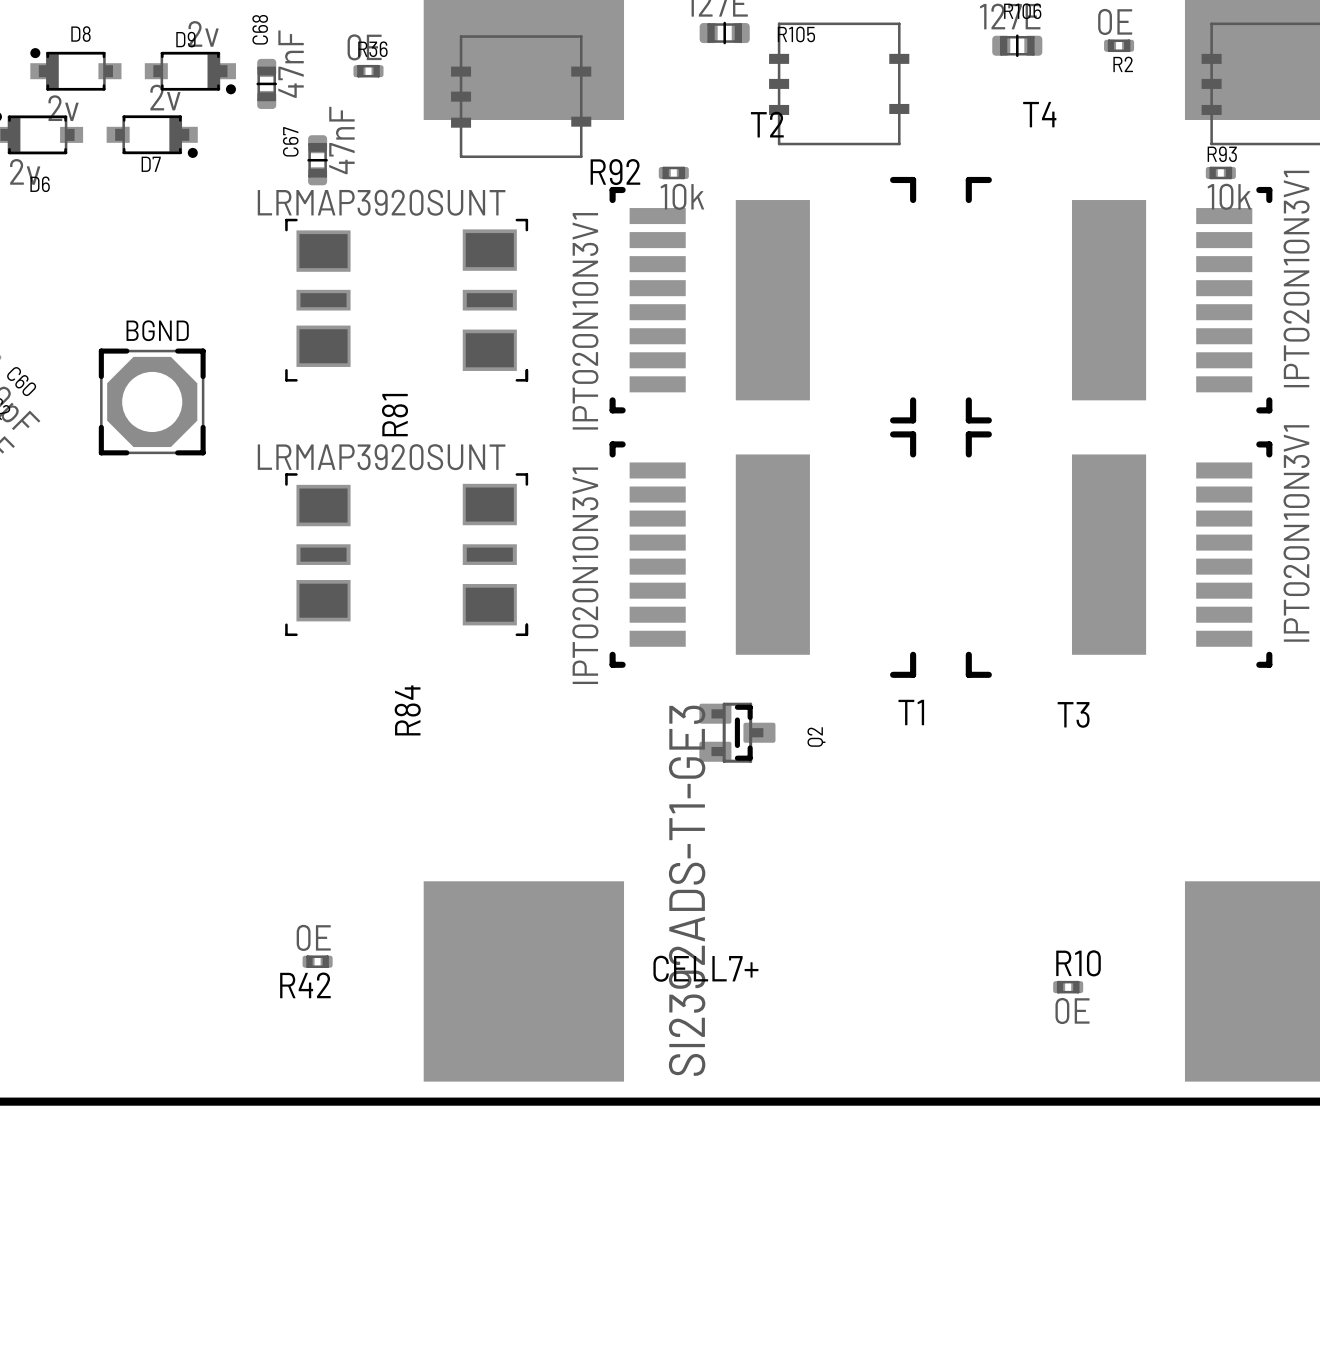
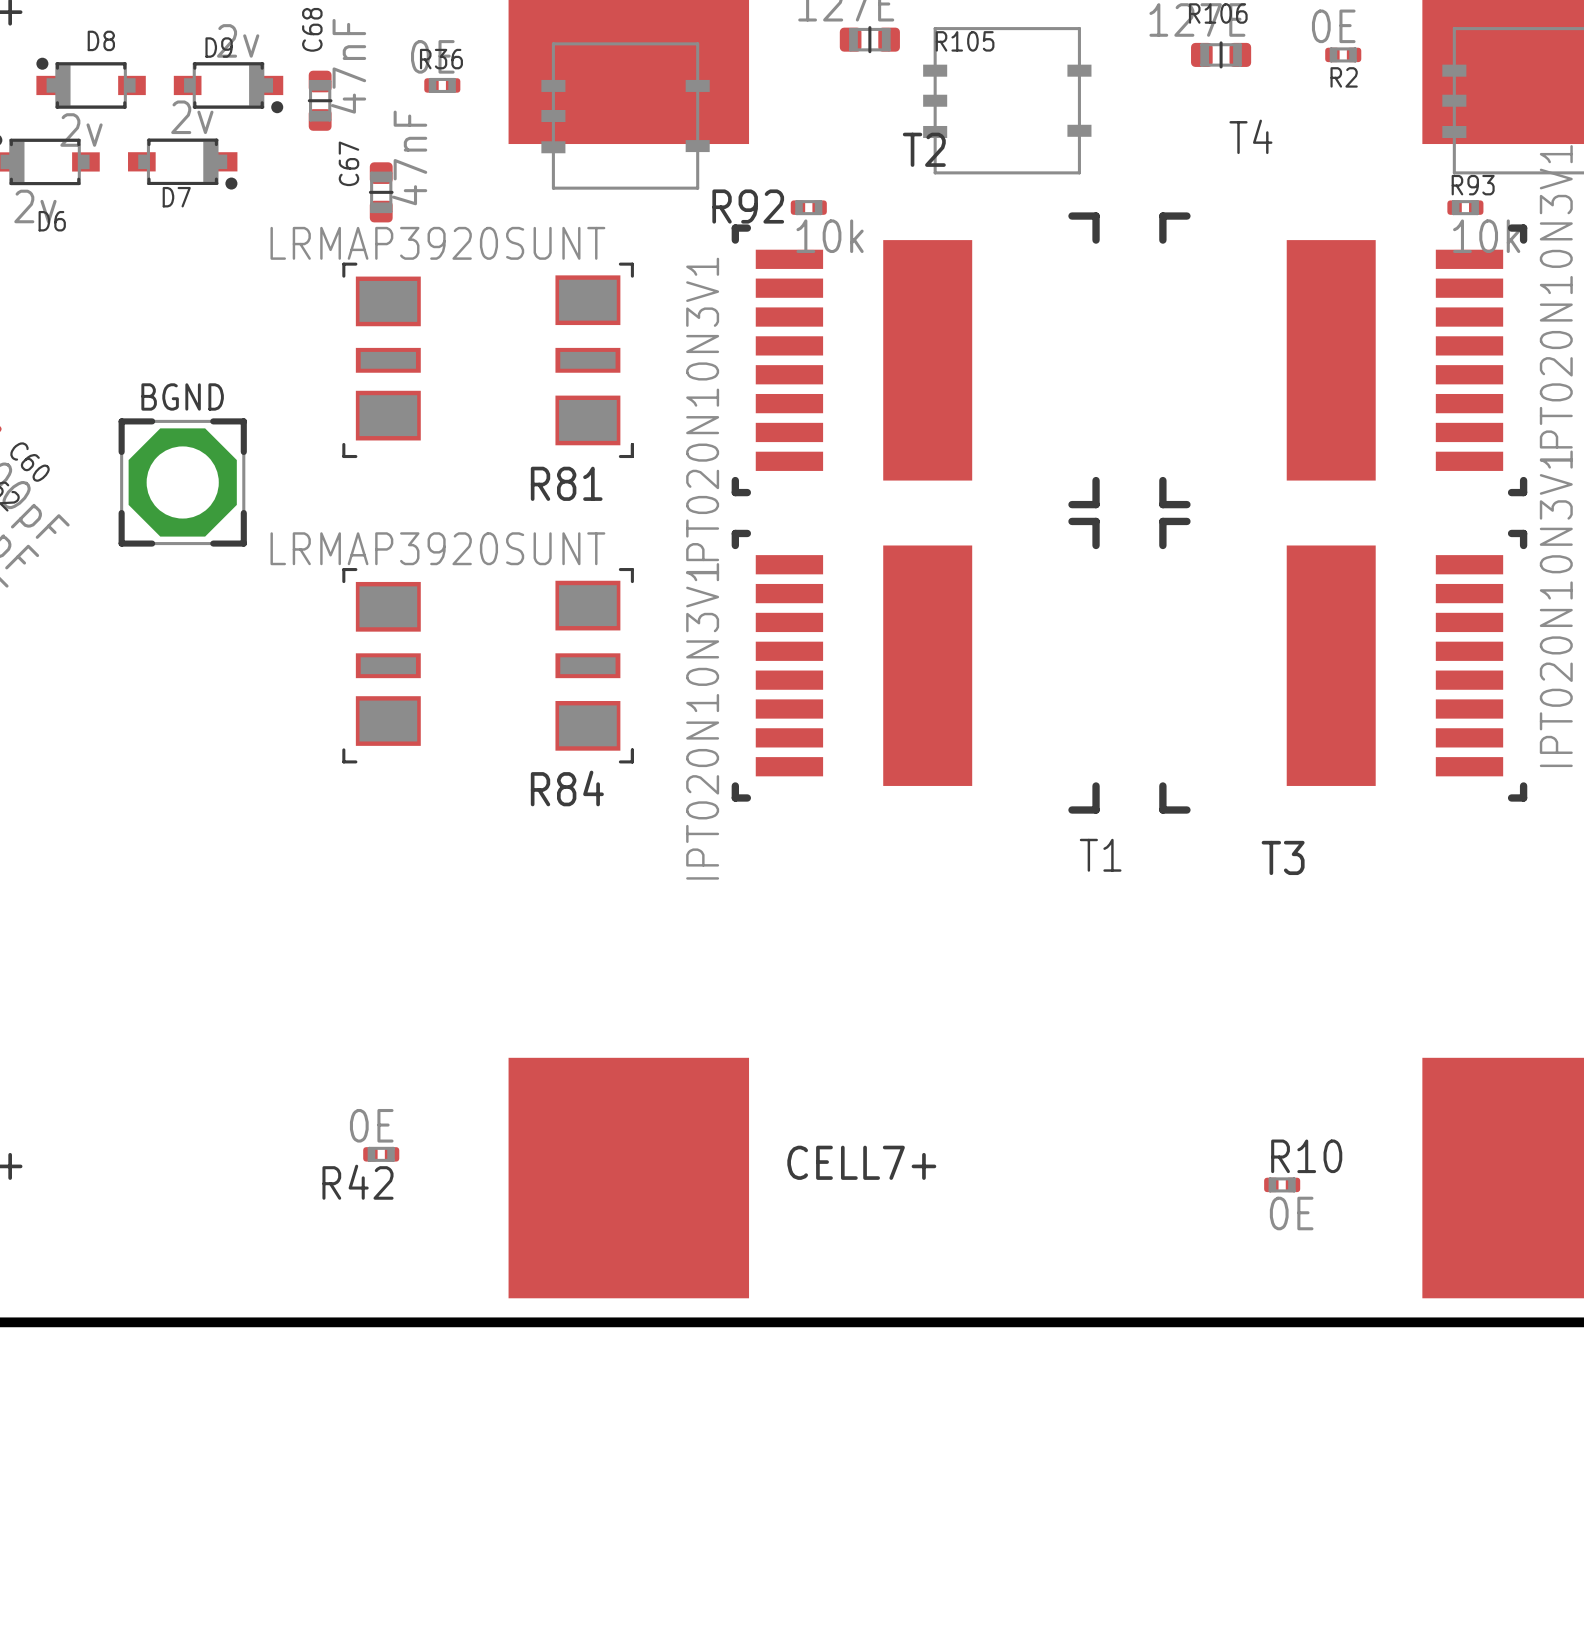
R81 name rotation: 0° (395, 415) -> 90° clockwise (566, 483)
R84 name rotation: 0° (407, 710) -> 90° clockwise (567, 788)
R84 name position: R84 (407, 710) -> R84 (567, 788)
Q2: SI2392ADS-T1-GE3 (737, 732) -> none

